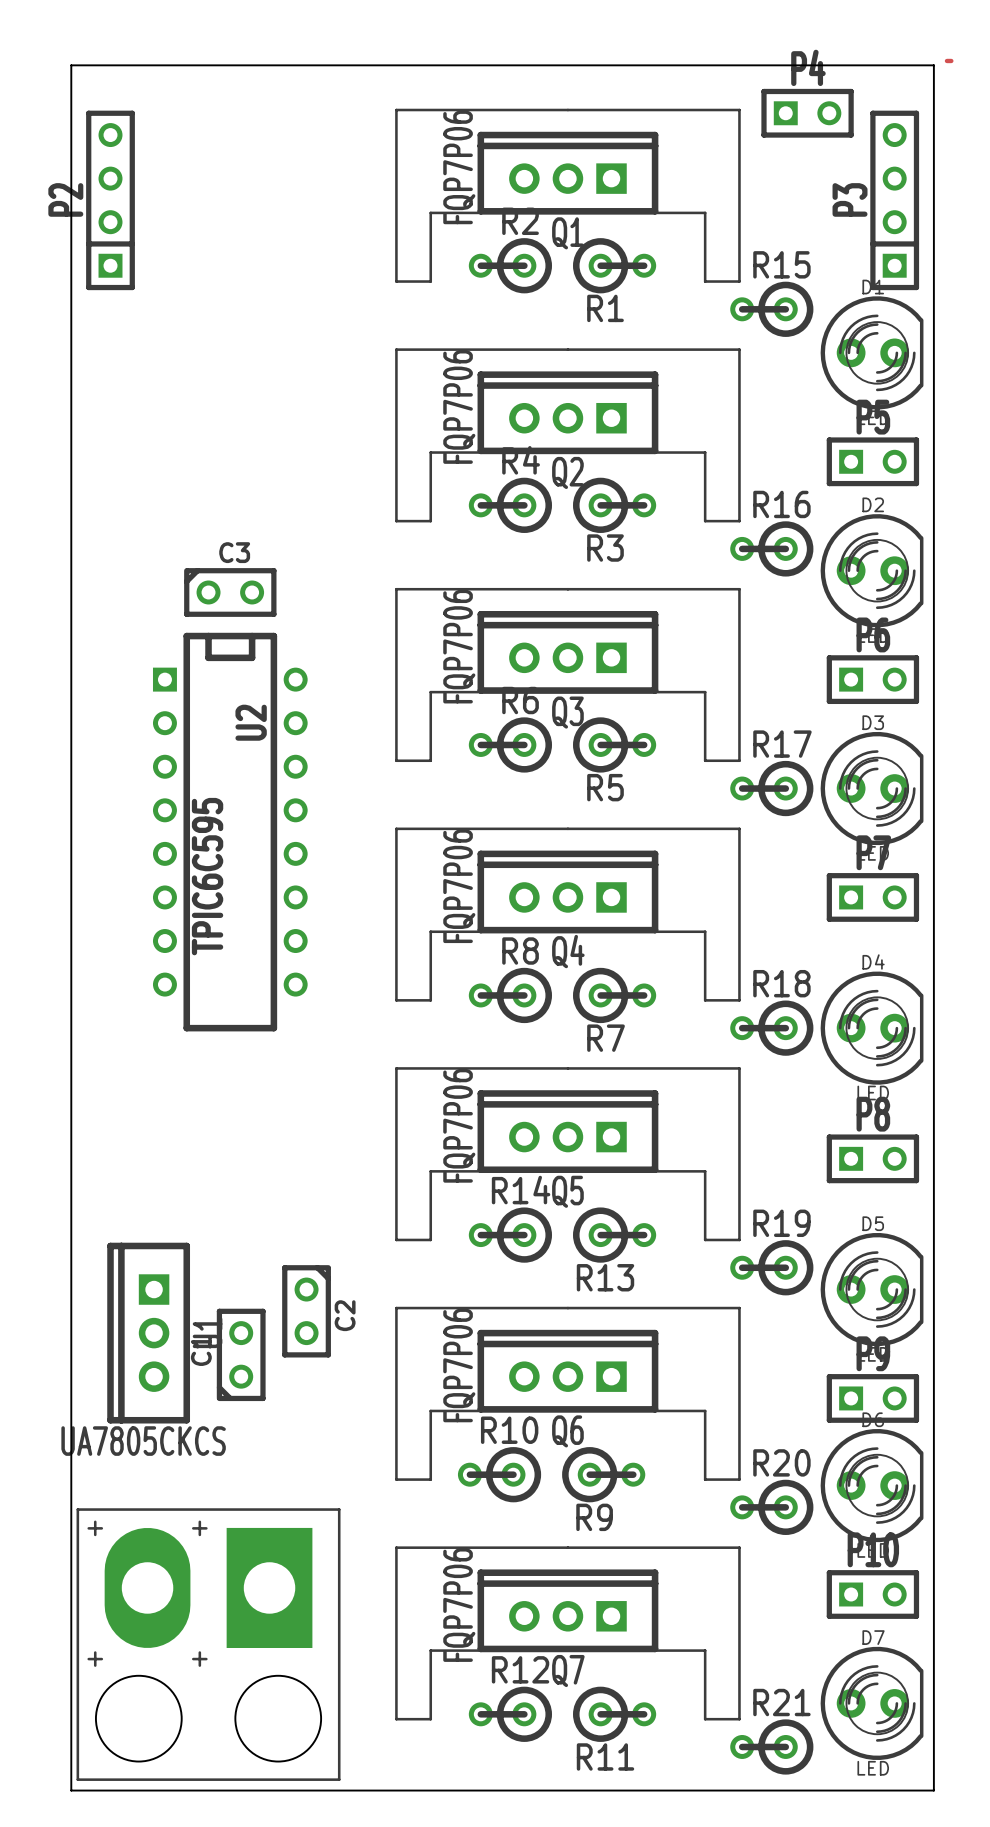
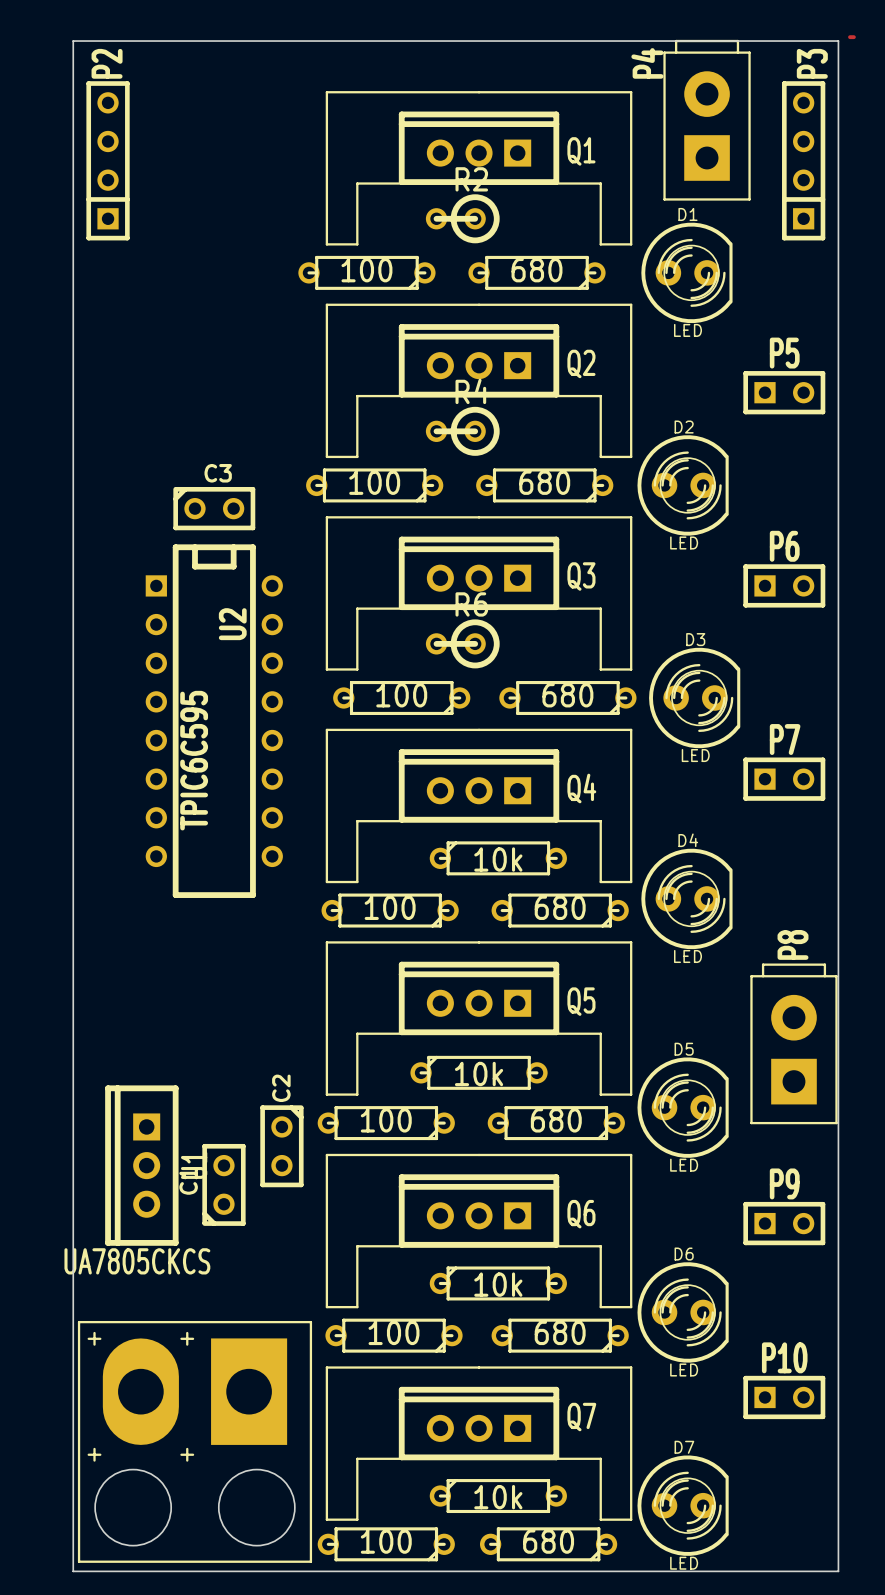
P4 name position: P4 (808, 67) -> P4 (647, 63)
P4 footprint: [761, 88, 854, 138] -> [663, 39, 751, 201]
Q1 value: FQP7P06 (459, 167) -> none
Q1 position: (567, 195) -> (479, 168)
P2 name position: P2 (65, 199) -> P2 (107, 63)
P3 name position: P3 (850, 199) -> P3 (812, 63)
Q1 name position: Q1 (567, 233) -> Q1 (581, 151)
R1: (614, 265) -> none
R15: (771, 309) -> none
part: none -> 100 (366, 272)
part: none -> 680 (537, 272)
D1 position: (872, 352) -> (686, 272)
Q2 value: FQP7P06 (459, 406) -> none
Q2 position: (567, 435) -> (479, 380)
Q2 name position: Q2 (567, 472) -> Q2 (581, 363)
R3: (614, 505) -> none
R16: (771, 548) -> none
part: none -> 100 (374, 485)
part: none -> 680 (544, 485)
D2 position: (872, 570) -> (683, 485)
Q3 value: FQP7P06 (459, 646) -> none
Q3 position: (567, 674) -> (479, 593)
Q3 name position: Q3 (567, 712) -> Q3 (581, 576)
R5: (614, 744) -> none
R17: (771, 788) -> none
D3 position: (872, 788) -> (694, 697)
part: none -> 100 (401, 697)
part: none -> 680 (567, 697)
Q4 value: FQP7P06 (459, 886) -> none
Q4 position: (567, 914) -> (479, 805)
Q4 name position: Q4 (568, 951) -> Q4 (581, 788)
part: none -> 10k (498, 858)
R8: (510, 995) -> none
R7: (614, 995) -> none
R18: (771, 1028) -> none
D4 position: (872, 1028) -> (686, 898)
part: none -> 100 (390, 910)
part: none -> 680 (560, 910)
P8 name position: P8 (873, 1114) -> P8 (793, 944)
Q5 value: FQP7P06 (459, 1125) -> none
P8 footprint: [826, 1134, 920, 1184] -> [750, 963, 838, 1125]
Q5 position: (567, 1154) -> (479, 1018)
Q5 name position: Q5 (567, 1191) -> Q5 (581, 1001)
part: none -> 10k (479, 1072)
R14: (510, 1235) -> none
R13: (614, 1235) -> none
R19: (771, 1267) -> none
part: none -> 100 (386, 1123)
part: none -> 680 (556, 1123)
D5 position: (872, 1289) -> (683, 1107)
C2 name position: C2 (345, 1315) -> C2 (281, 1088)
Q6 value: FQP7P06 (459, 1365) -> none
Q6 position: (567, 1393) -> (479, 1231)
Q6 name position: Q6 (567, 1431) -> Q6 (581, 1214)
part: none -> 10k (498, 1283)
R10: (499, 1474) -> none
R9: (603, 1474) -> none
D6 position: (872, 1485) -> (683, 1312)
R20: (771, 1507) -> none
part: none -> 100 (394, 1335)
part: none -> 680 (560, 1335)
Q7 value: FQP7P06 (459, 1604) -> none
Q7 position: (567, 1633) -> (479, 1443)
Q7 name position: Q7 (568, 1671) -> Q7 (581, 1417)
D7 position: (872, 1703) -> (683, 1505)
part: none -> 10k (498, 1496)
R12: (510, 1714) -> none
R11: (614, 1714) -> none
R21: (771, 1746) -> none
part: none -> 100 (386, 1544)
part: none -> 680 (548, 1544)

